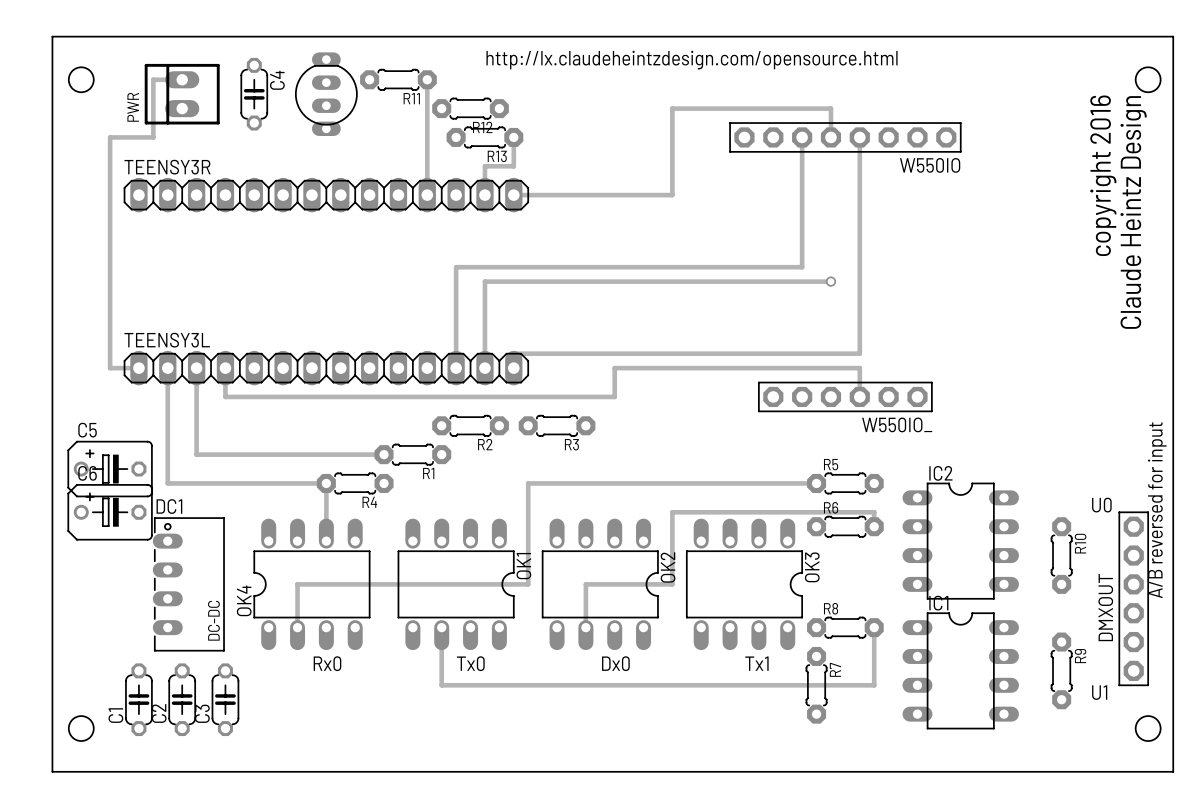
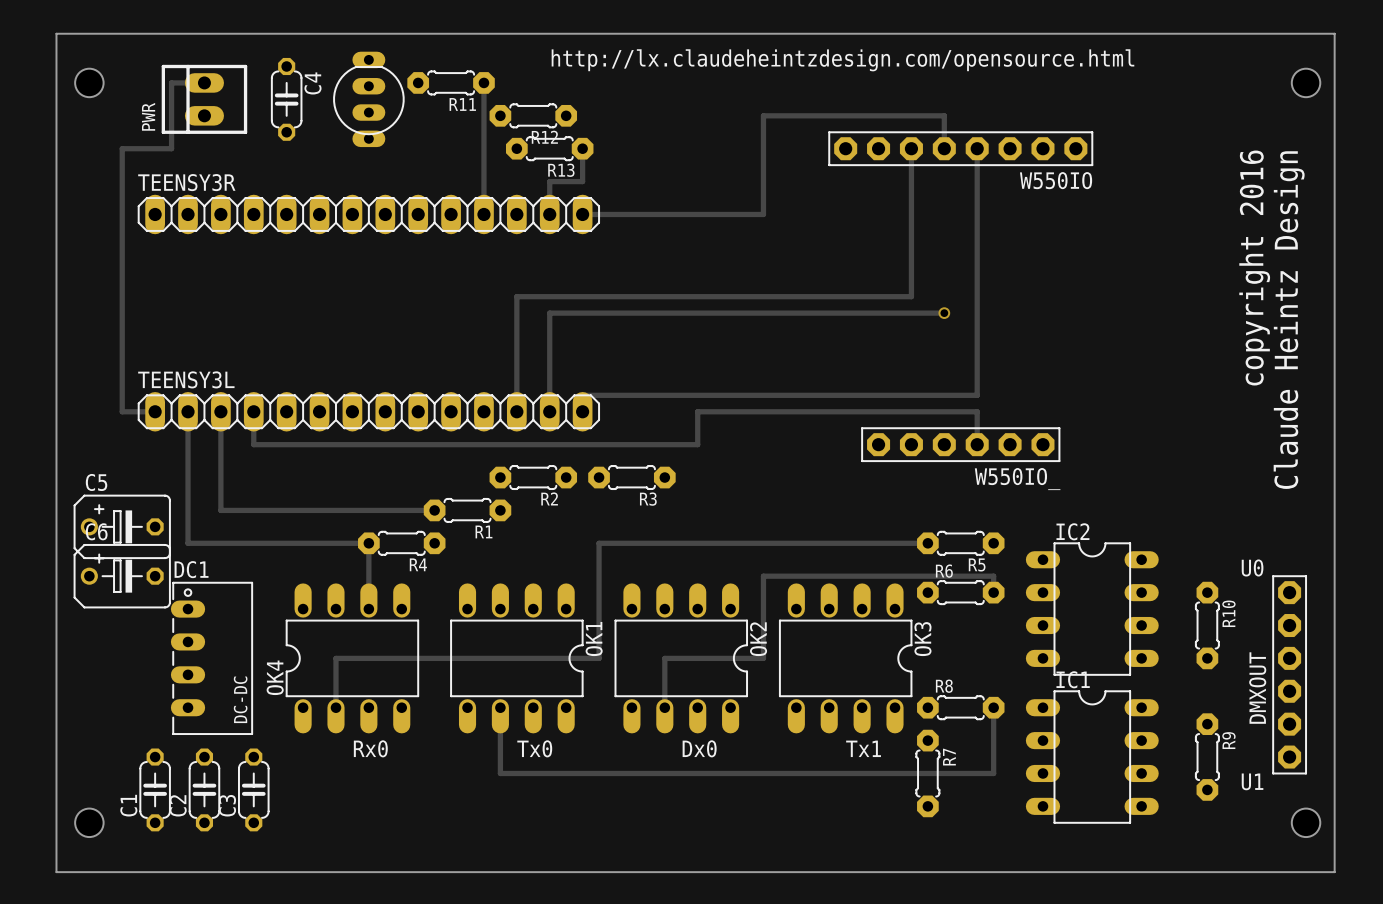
text position: copyright 2016 (1103, 175) -> copyright 2016 (1254, 268)
text position: Claude Heintz Design (1133, 212) -> Claude Heintz Design (1289, 320)
R5 name position: R5 (831, 464) -> R5 (977, 564)
text: A/B reversed for input (1157, 510) -> none

